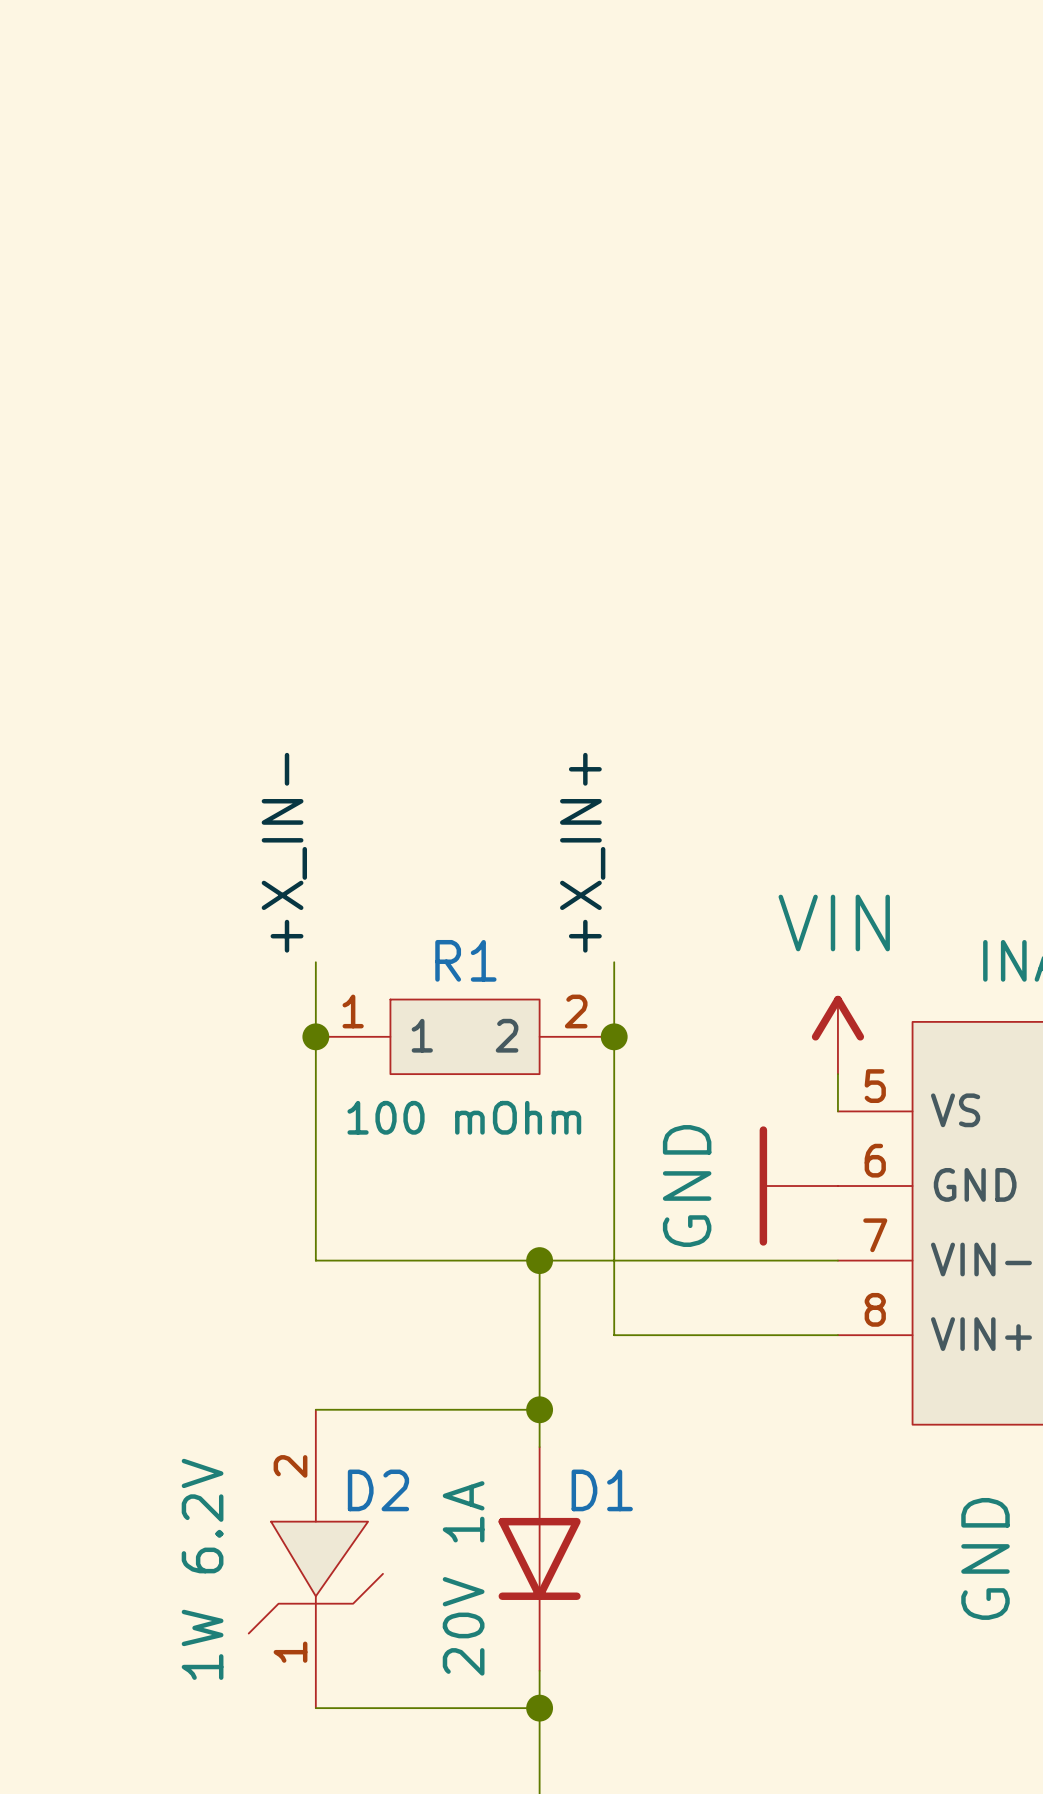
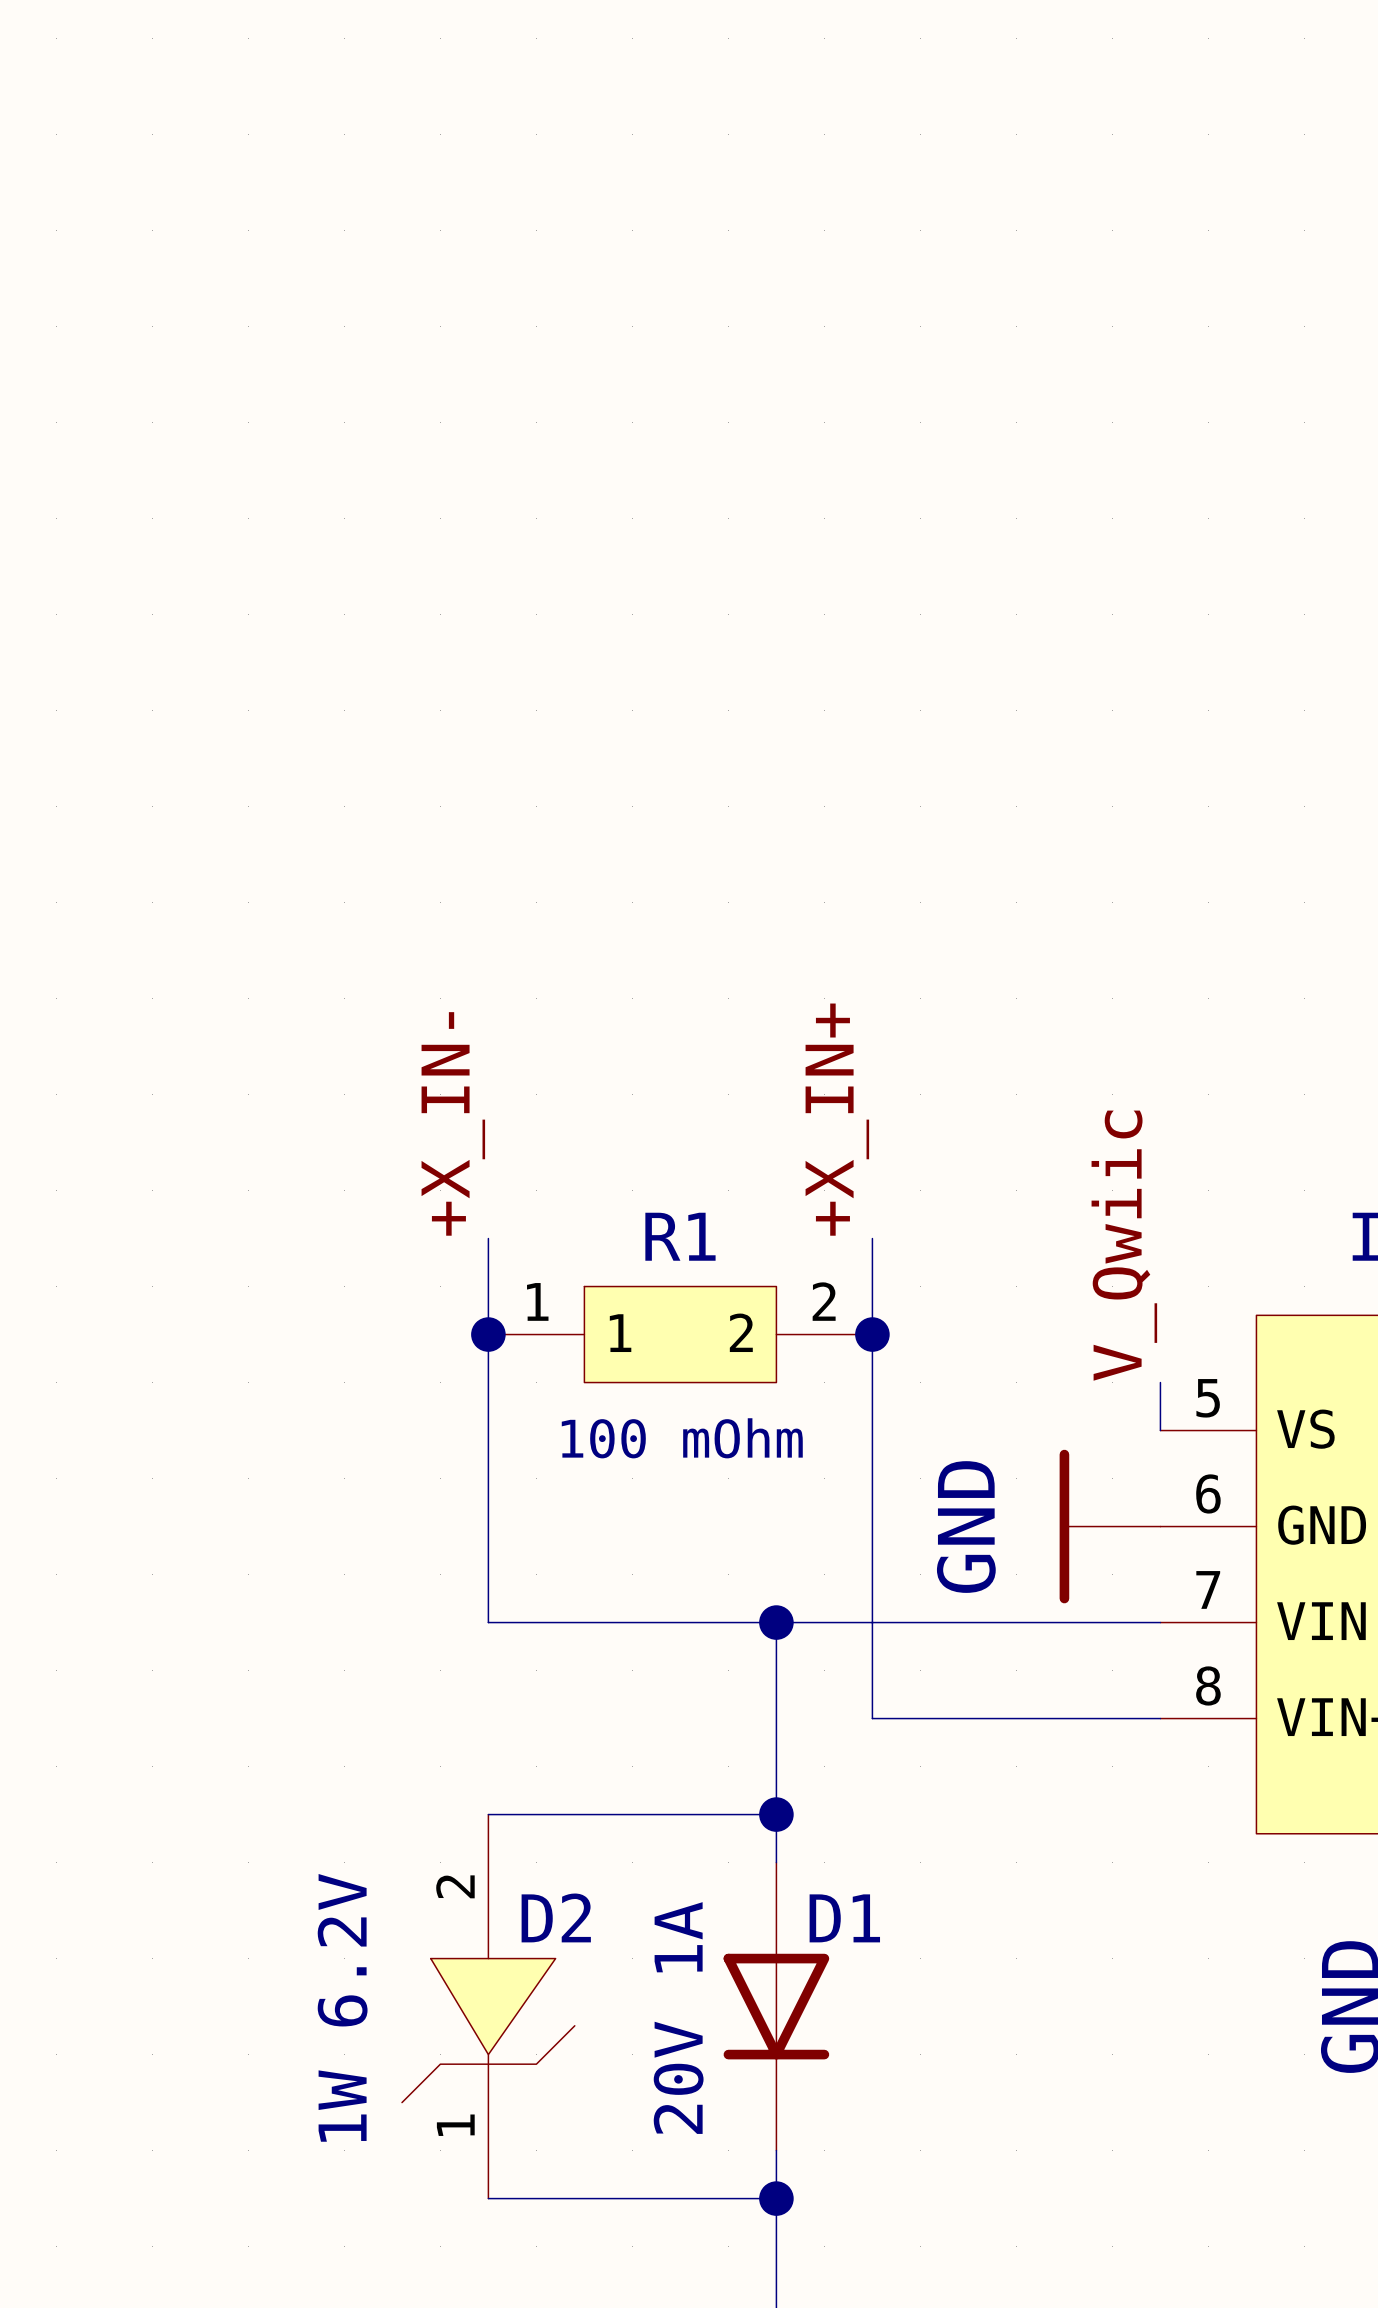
label: none -> V_Qwiic (1124, 1245)
power symbol: VIN (837, 1034) -> none

